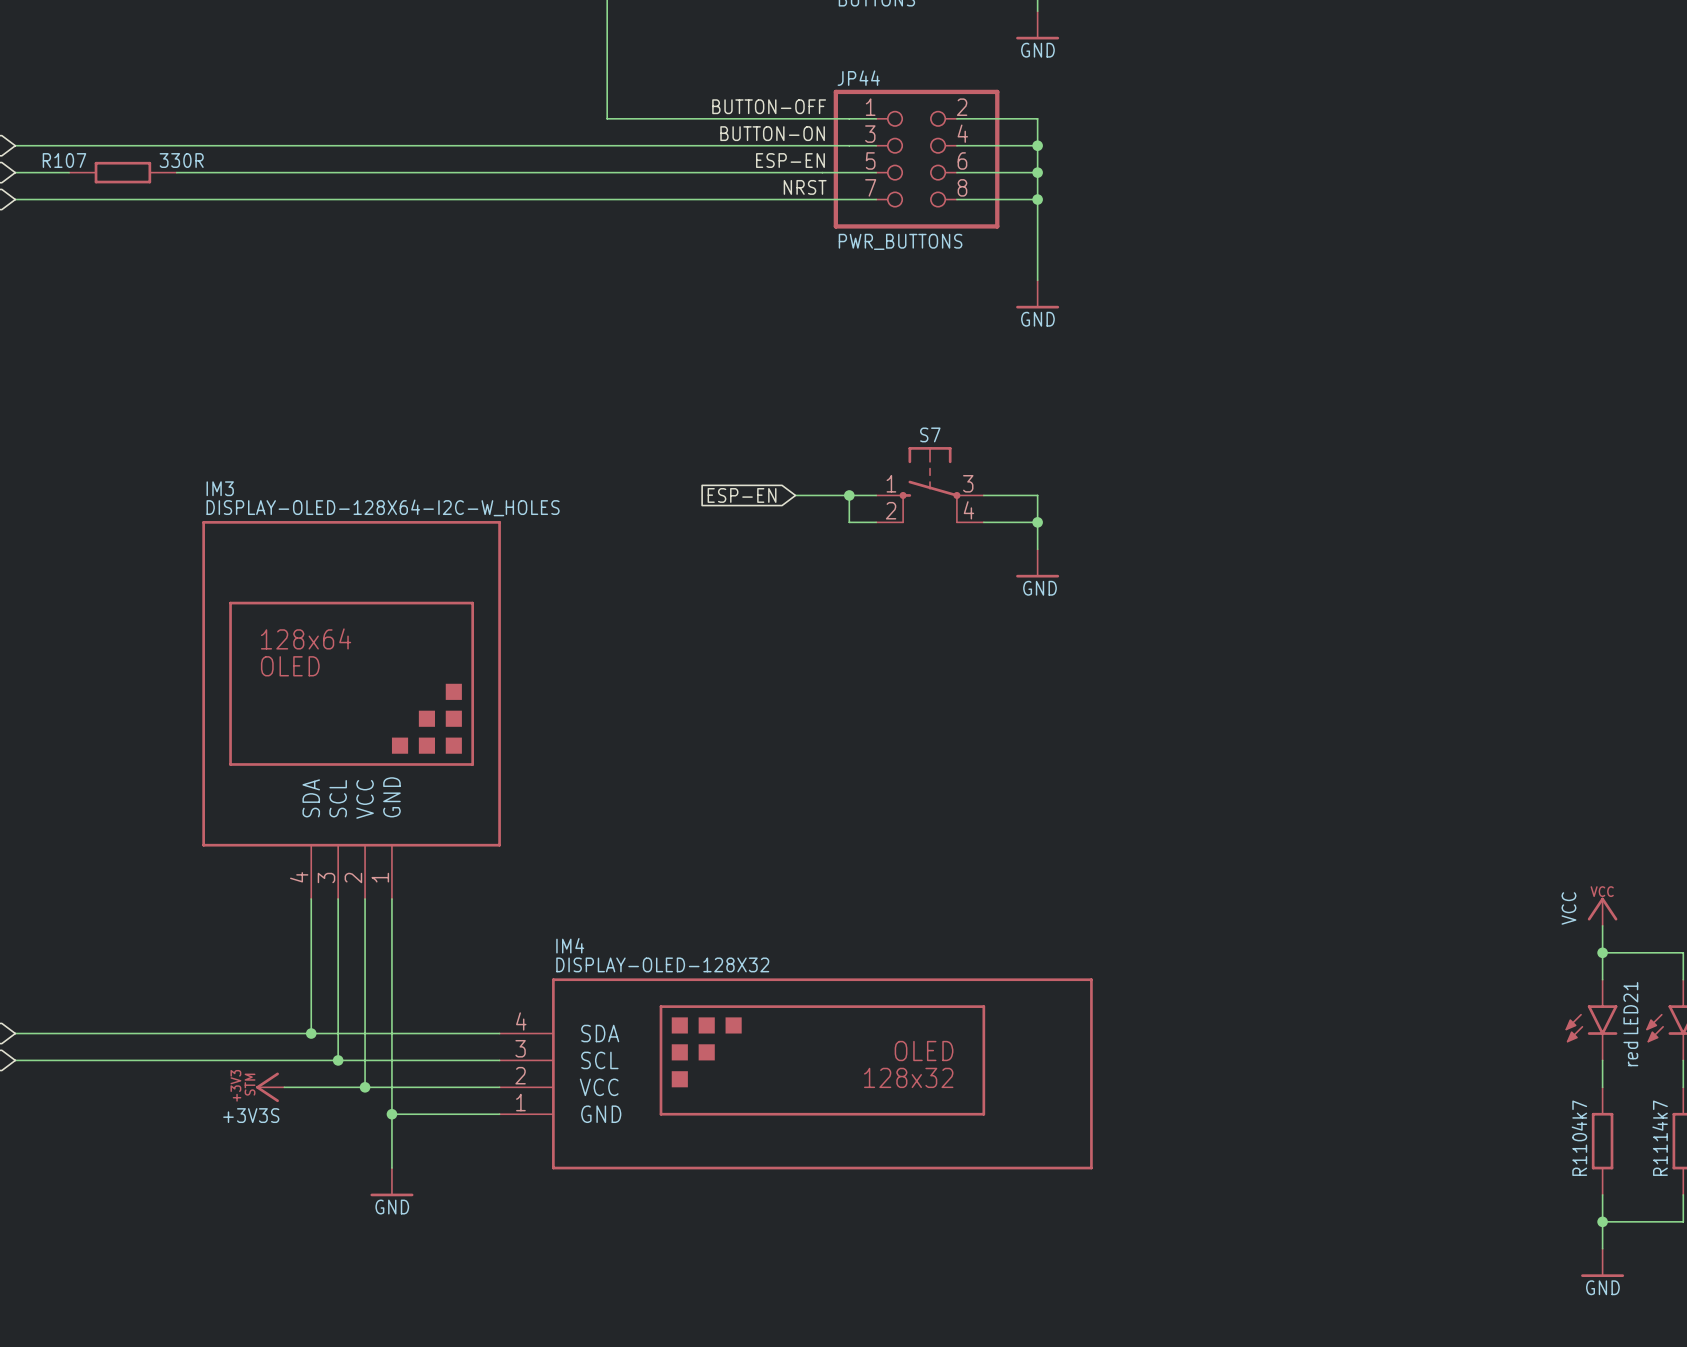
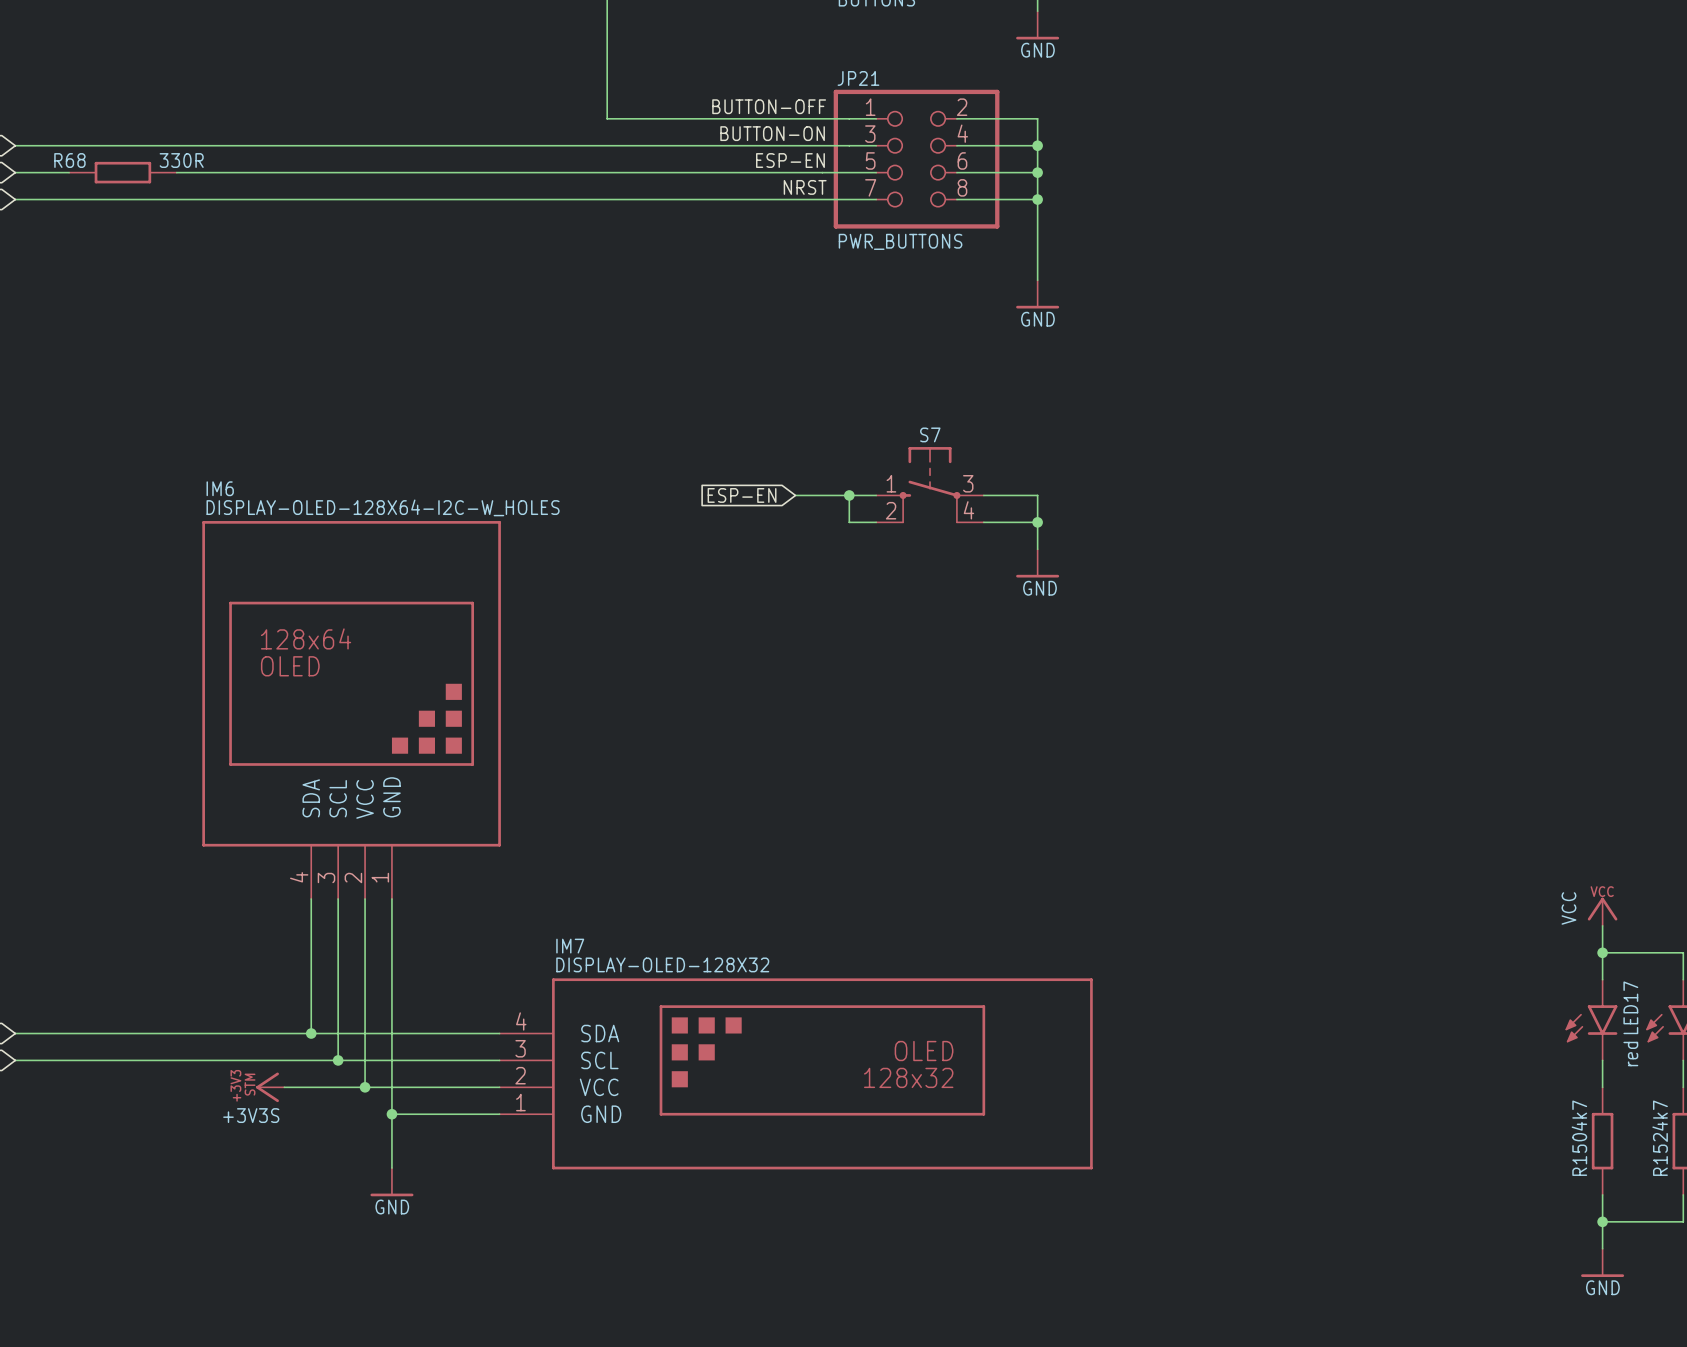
JP44 name: JP44 (858, 78) -> JP21 (858, 78)
R107 name: R107 (64, 160) -> R68 (69, 160)
IM3 name: IM3 (220, 488) -> IM6 (220, 488)
IM4 name: IM4 (570, 945) -> IM7 (570, 946)
LED21 name: LED21 (1630, 1008) -> LED17 (1630, 1007)
R110 name: R110 (1579, 1154) -> R150 (1579, 1154)
R111 name: R111 (1660, 1154) -> R152 (1660, 1154)

